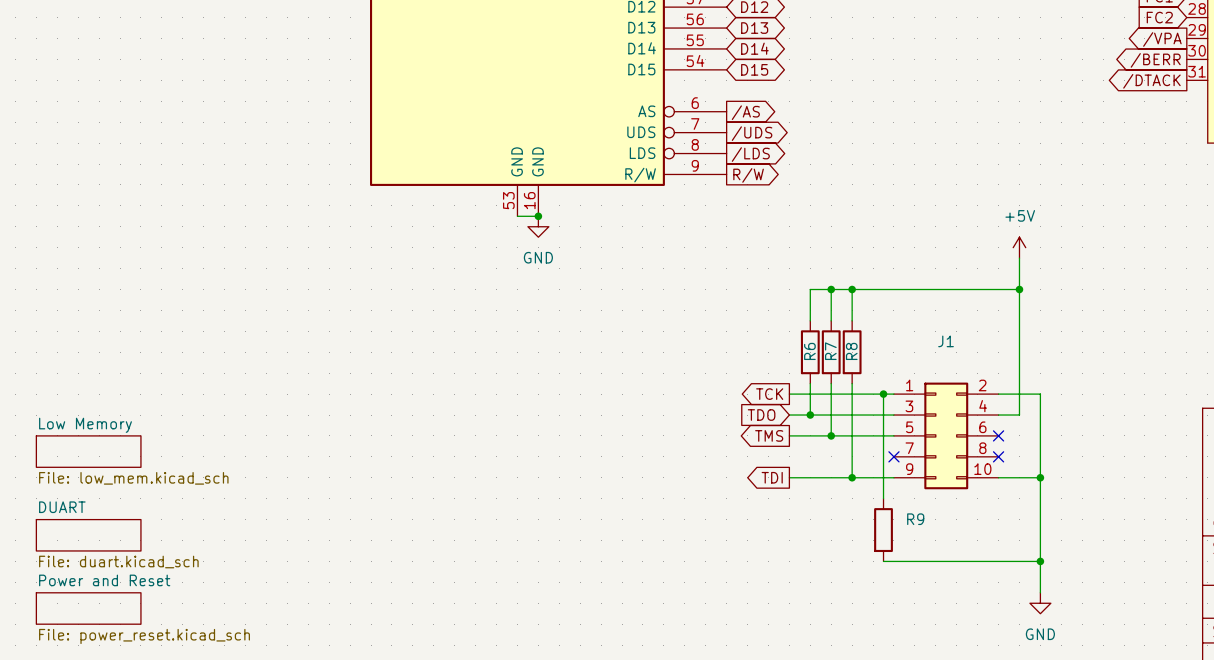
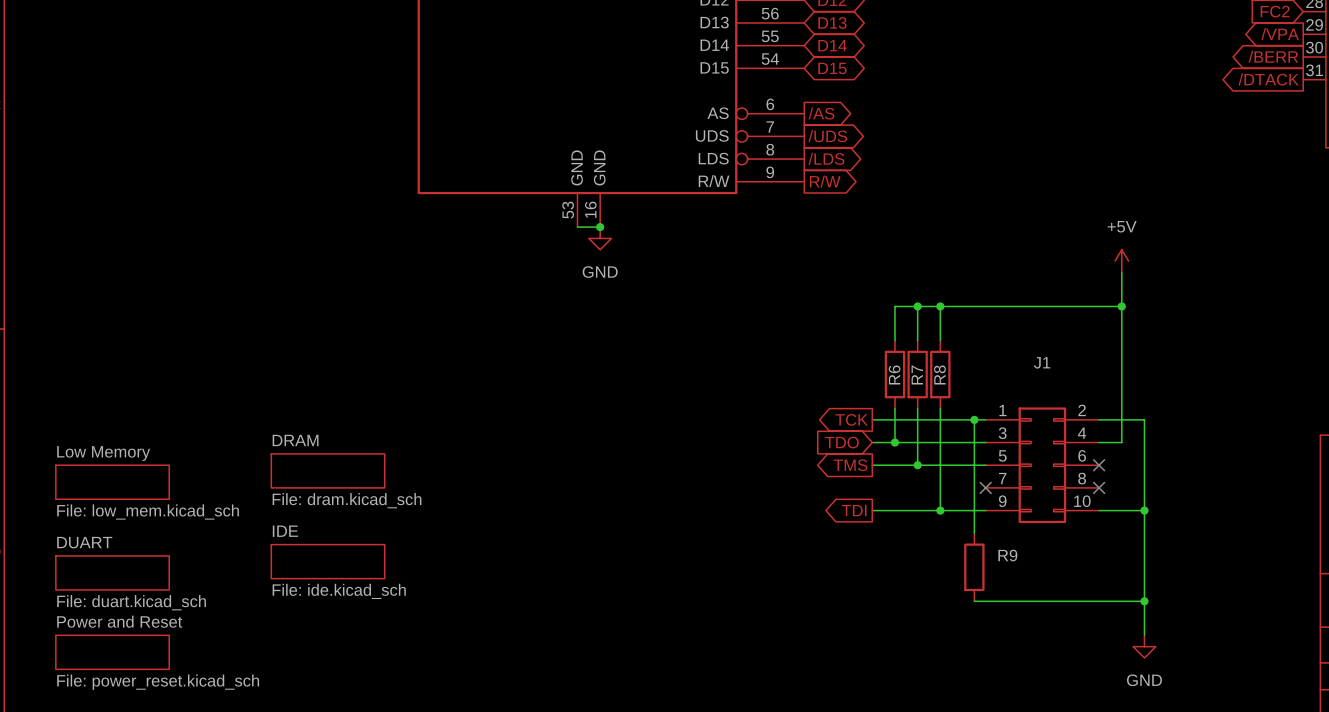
sheet DRAM: none -> File: dram.kicad_sch (328, 470)
sheet IDE: none -> File: ide.kicad_sch (328, 561)

